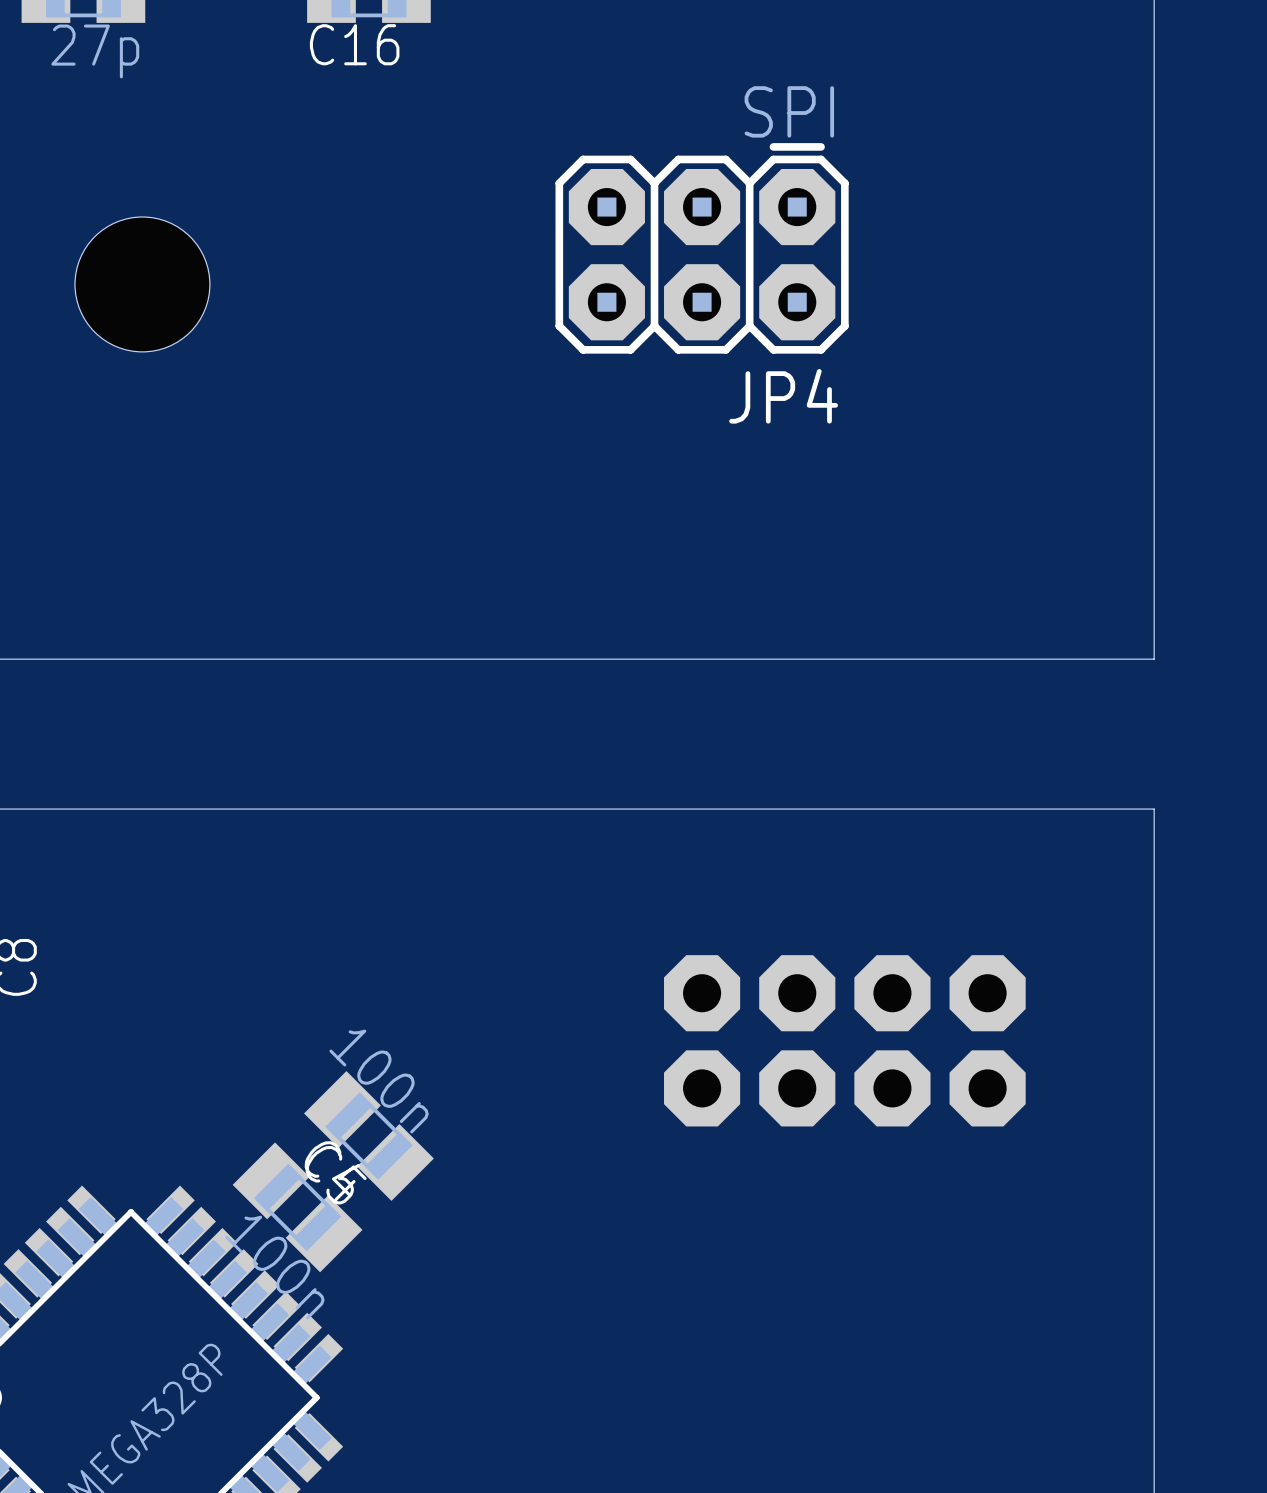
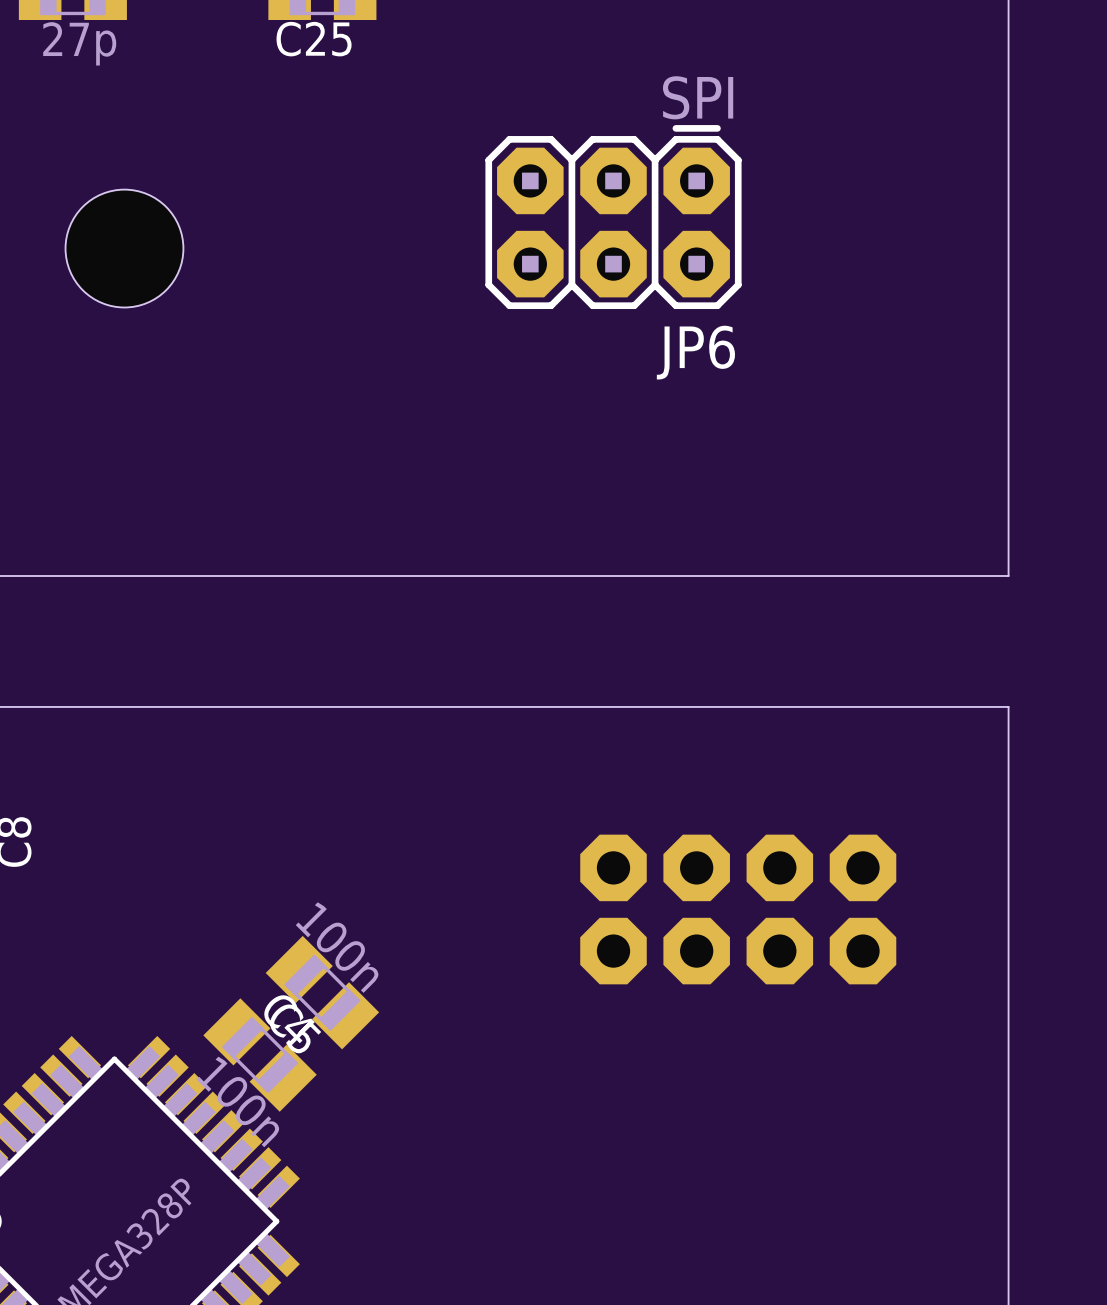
C16 name: C16 (354, 44) -> C25 (314, 39)
JP4 name: JP4 (783, 396) -> JP6 (695, 352)

